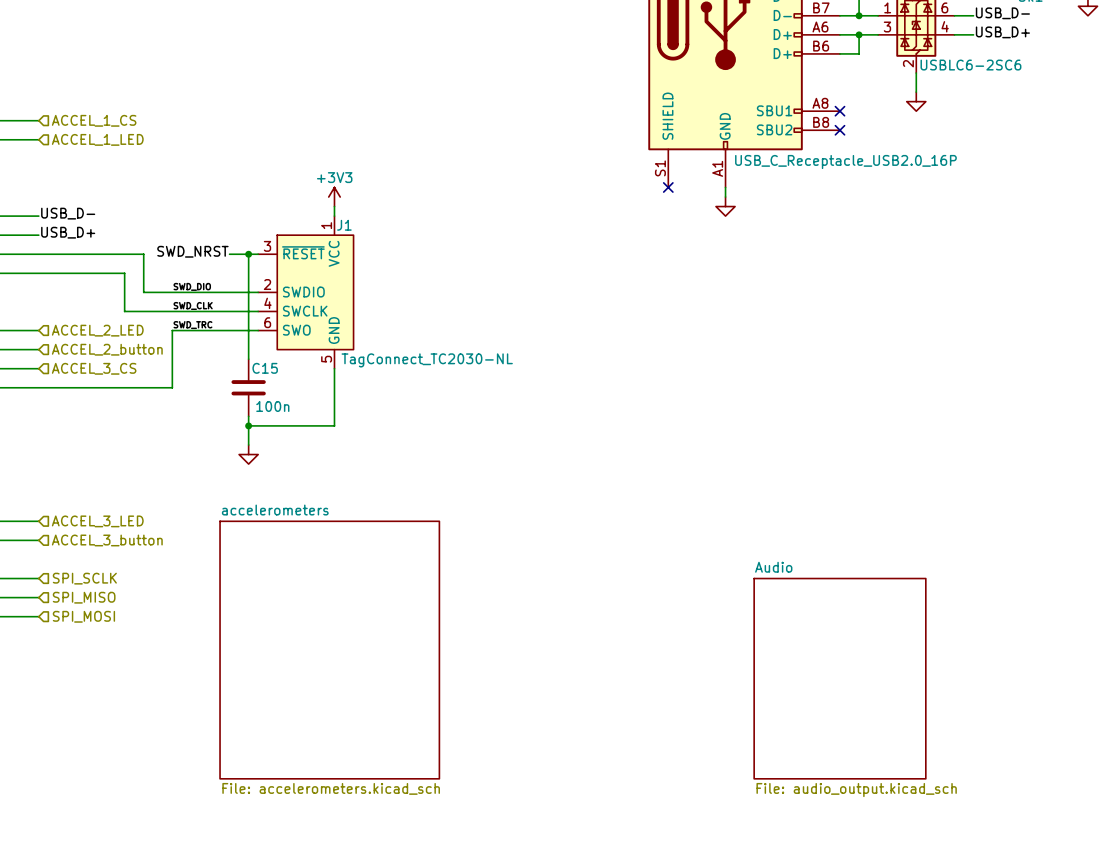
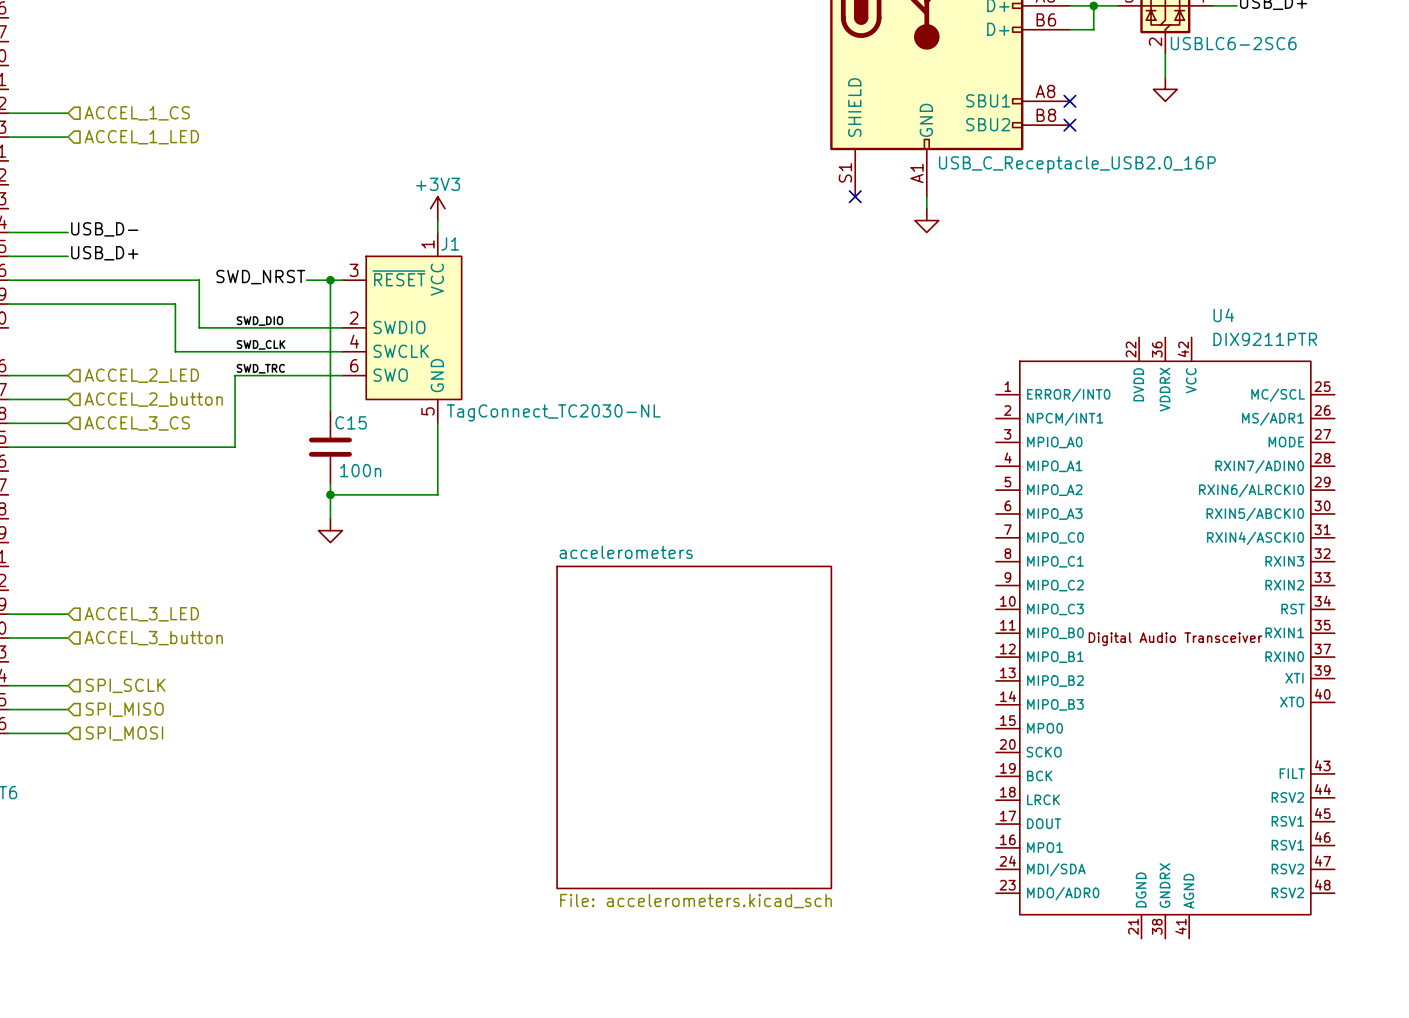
U4: none -> DIX9211PTR (1165, 638)
sheet accelerometers: none -> File: accelerometers.kicad_sch (694, 727)
sheet accelerometers: File: accelerometers.kicad_sch (329, 650) -> none
sheet Audio: File: audio_output.kicad_sch (839, 678) -> none

